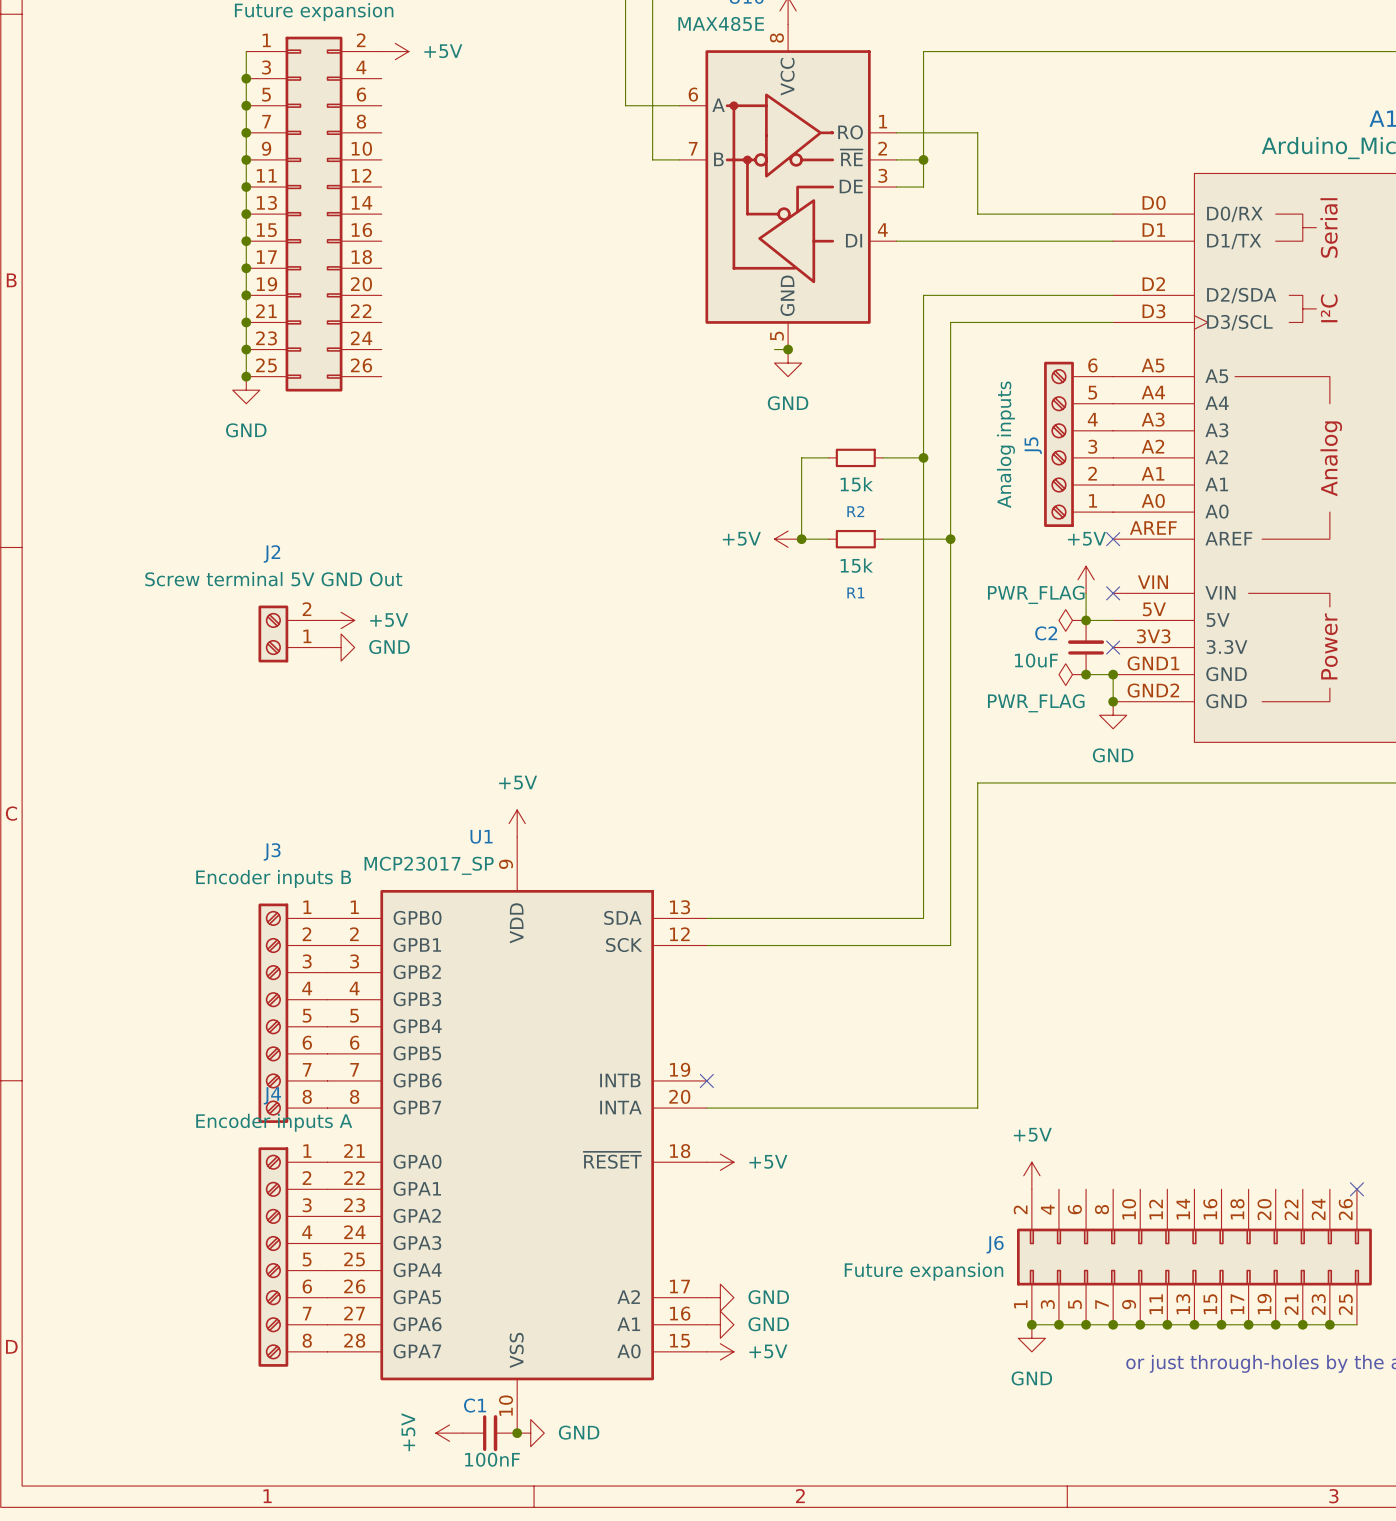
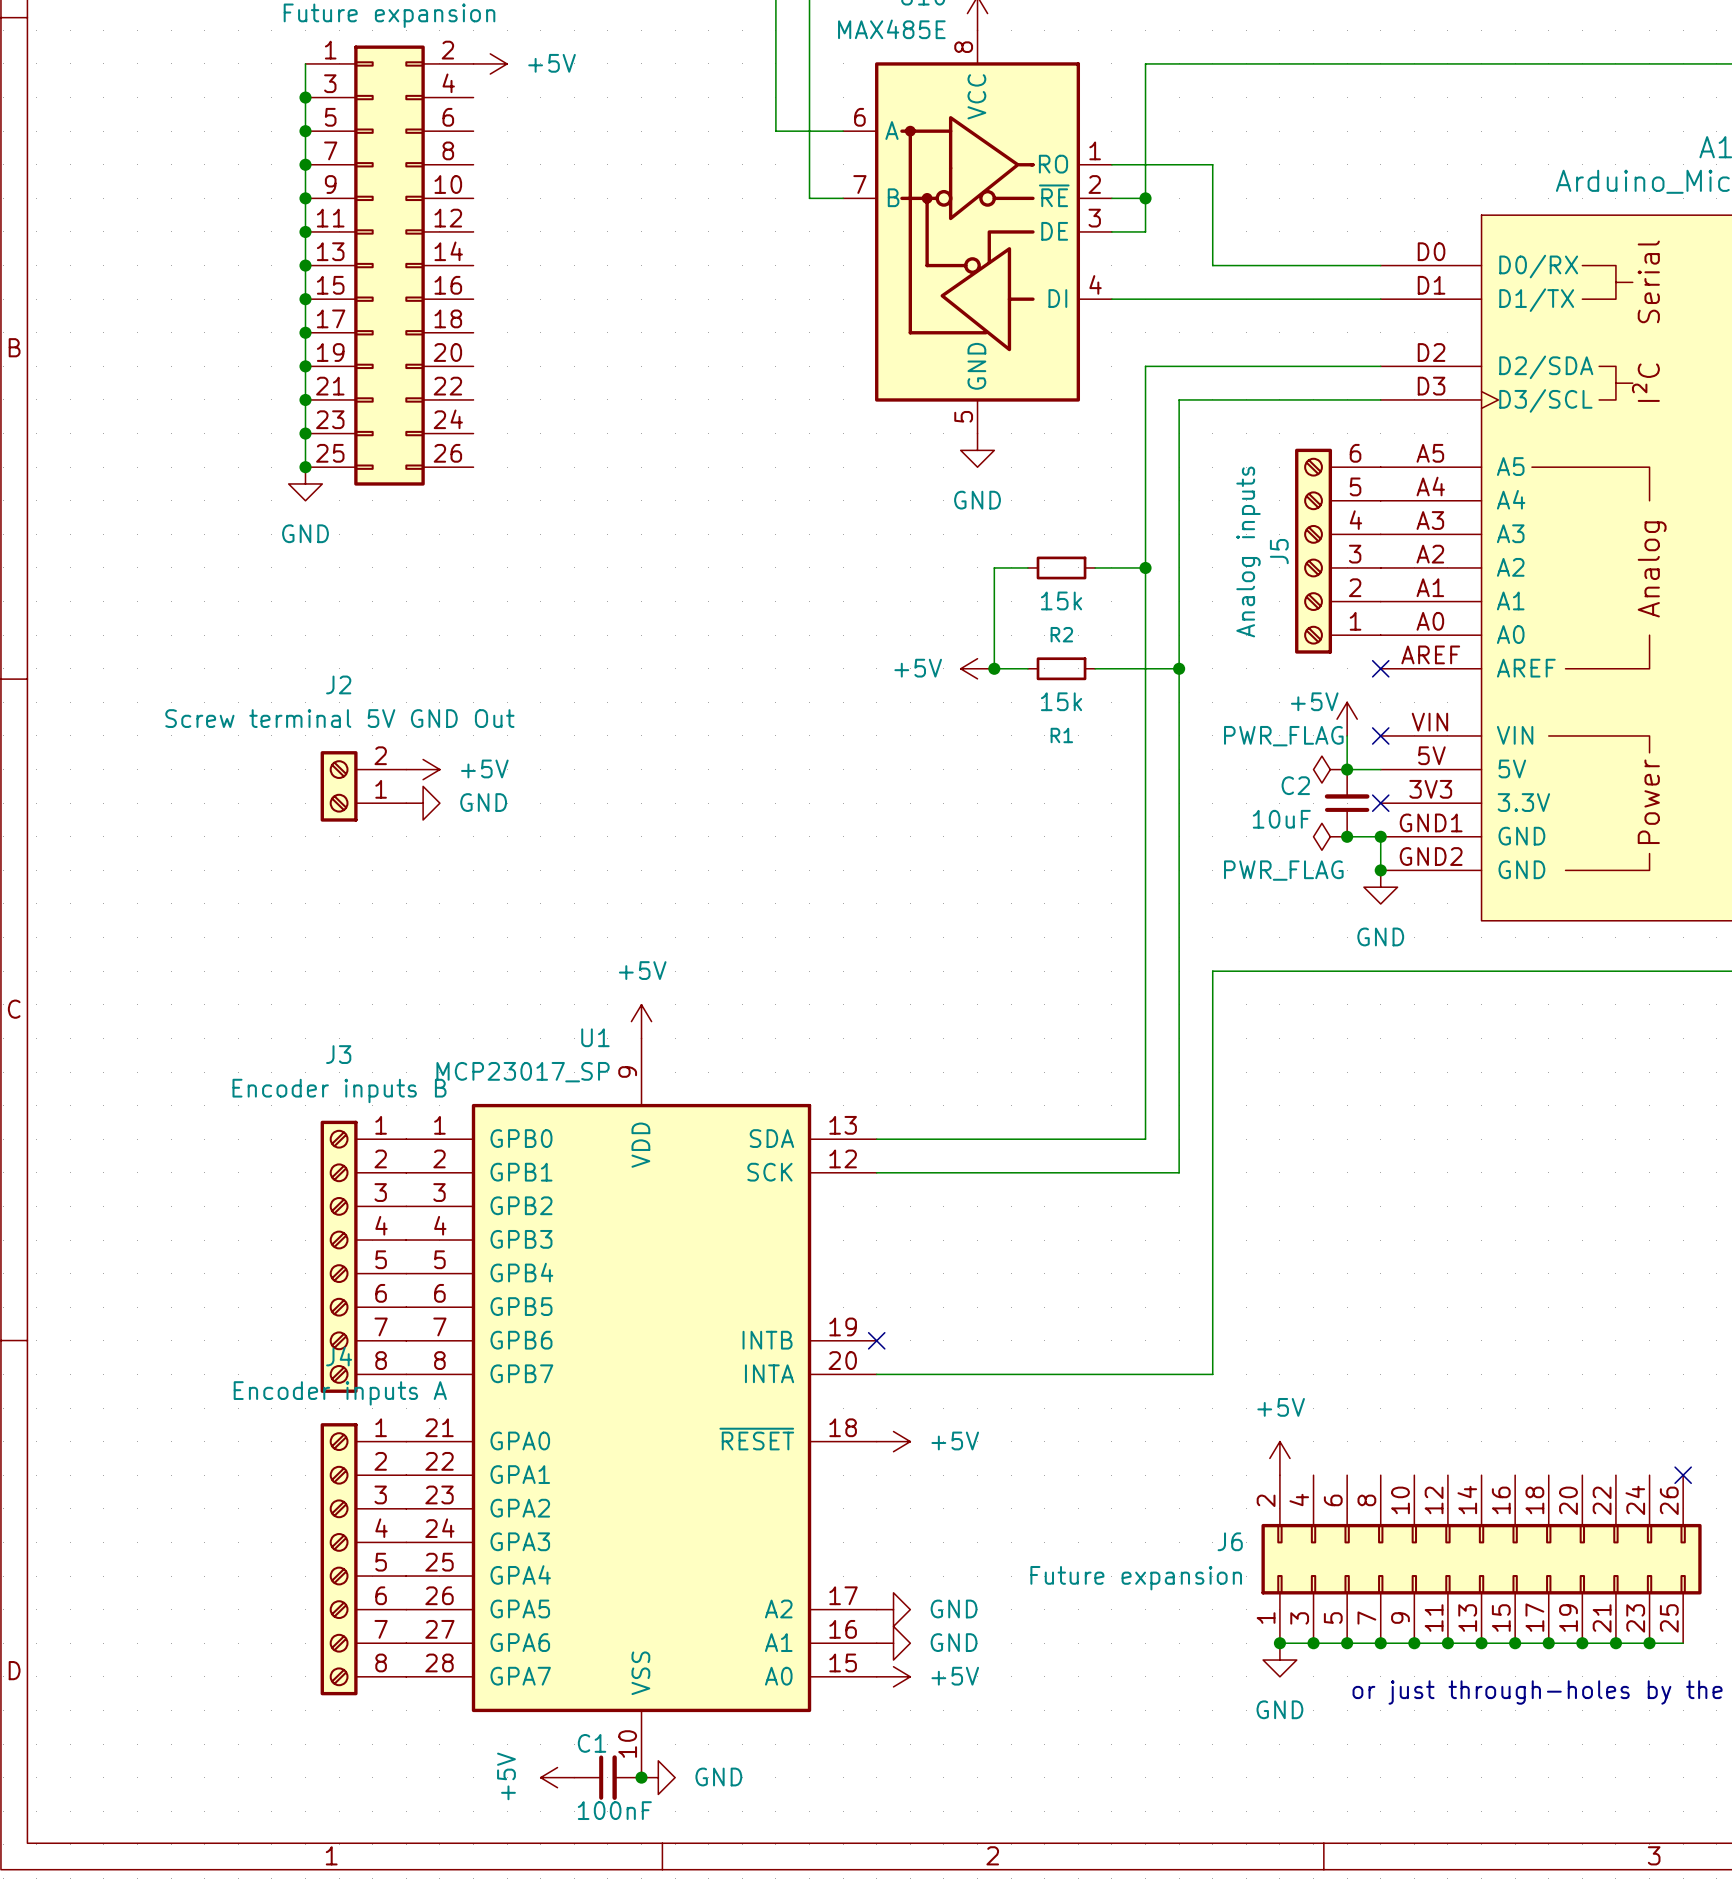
wire: (774, 349) (788, 349) -> none
junction: (788, 349) -> none
power symbol text position: +5V (1086, 538) -> +5V (1314, 701)

